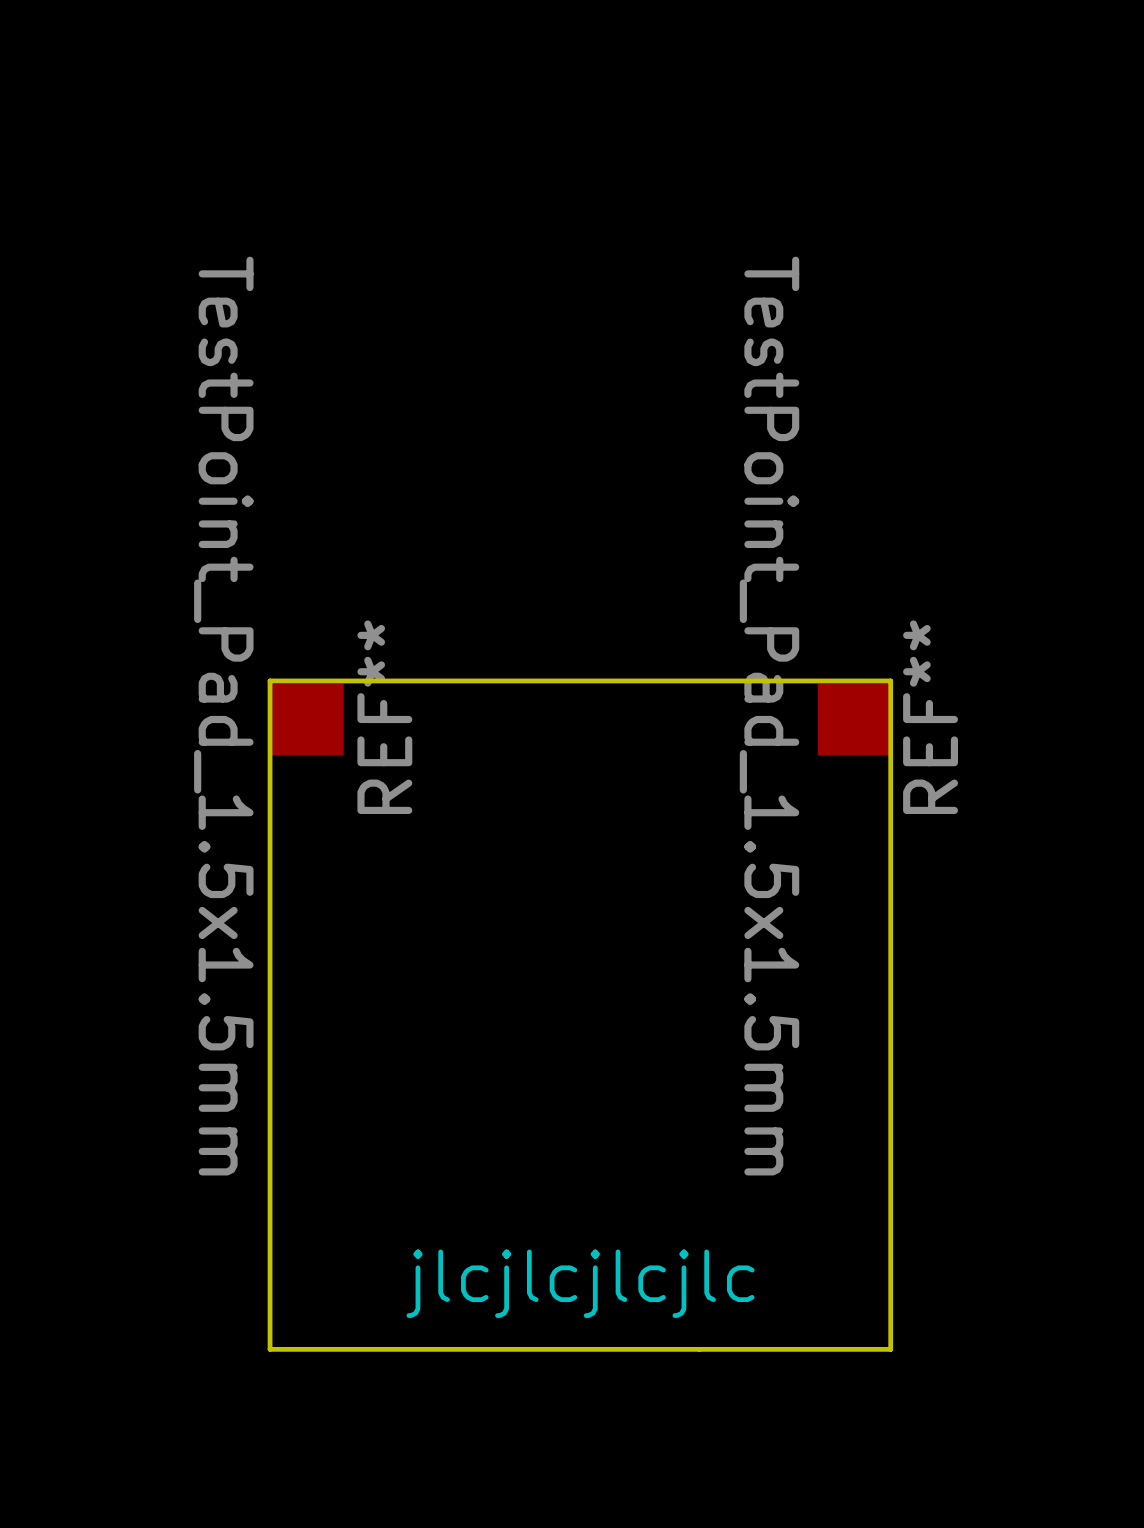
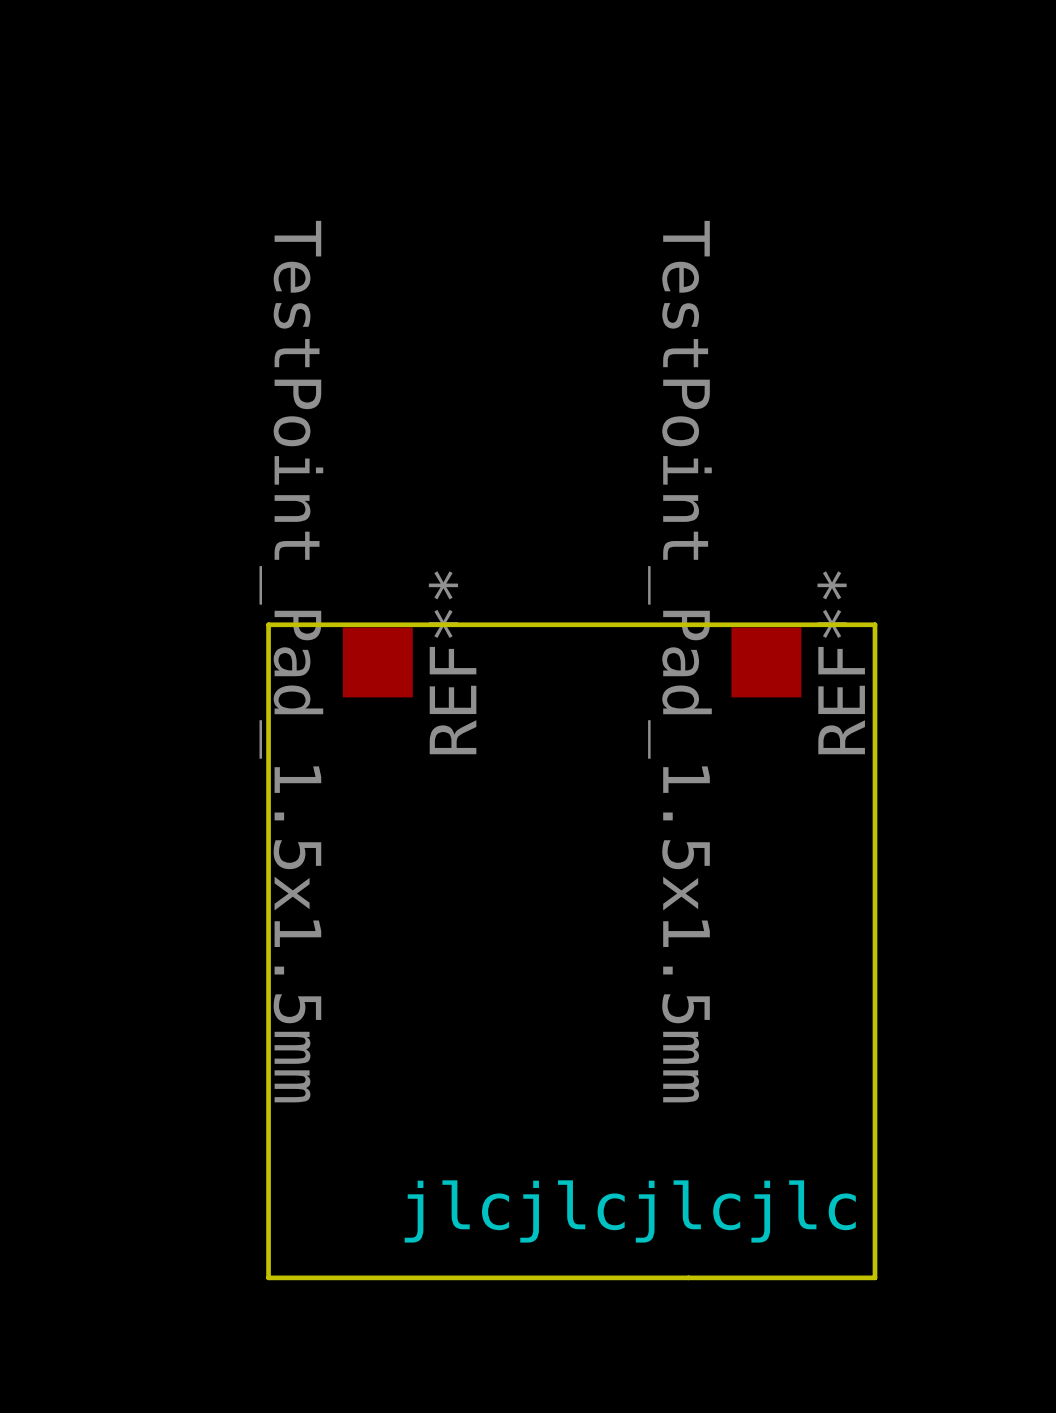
REF** position: (307, 719) -> (377, 662)
REF** position: (853, 719) -> (766, 662)

